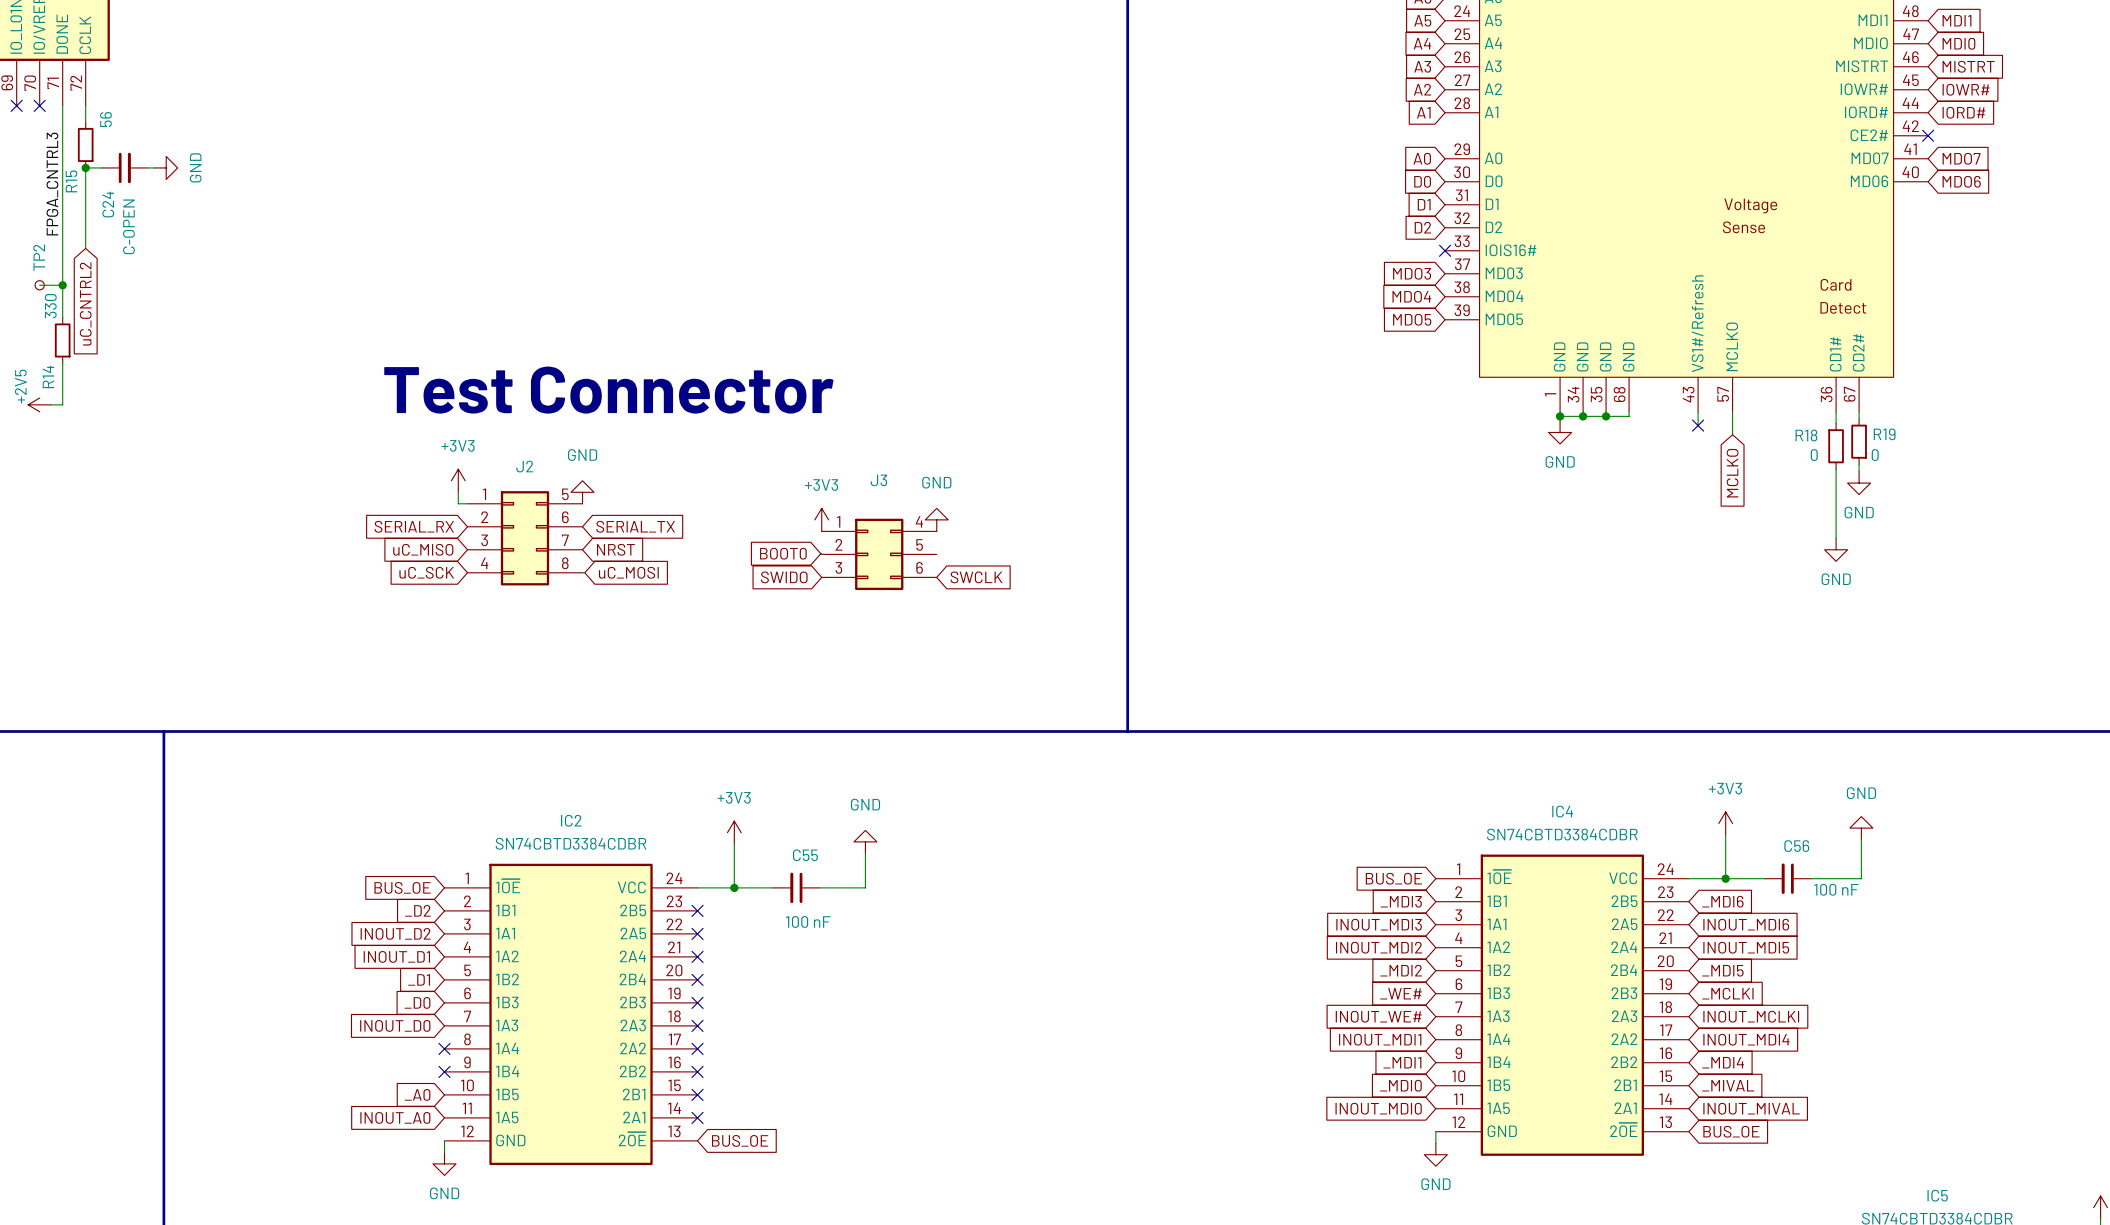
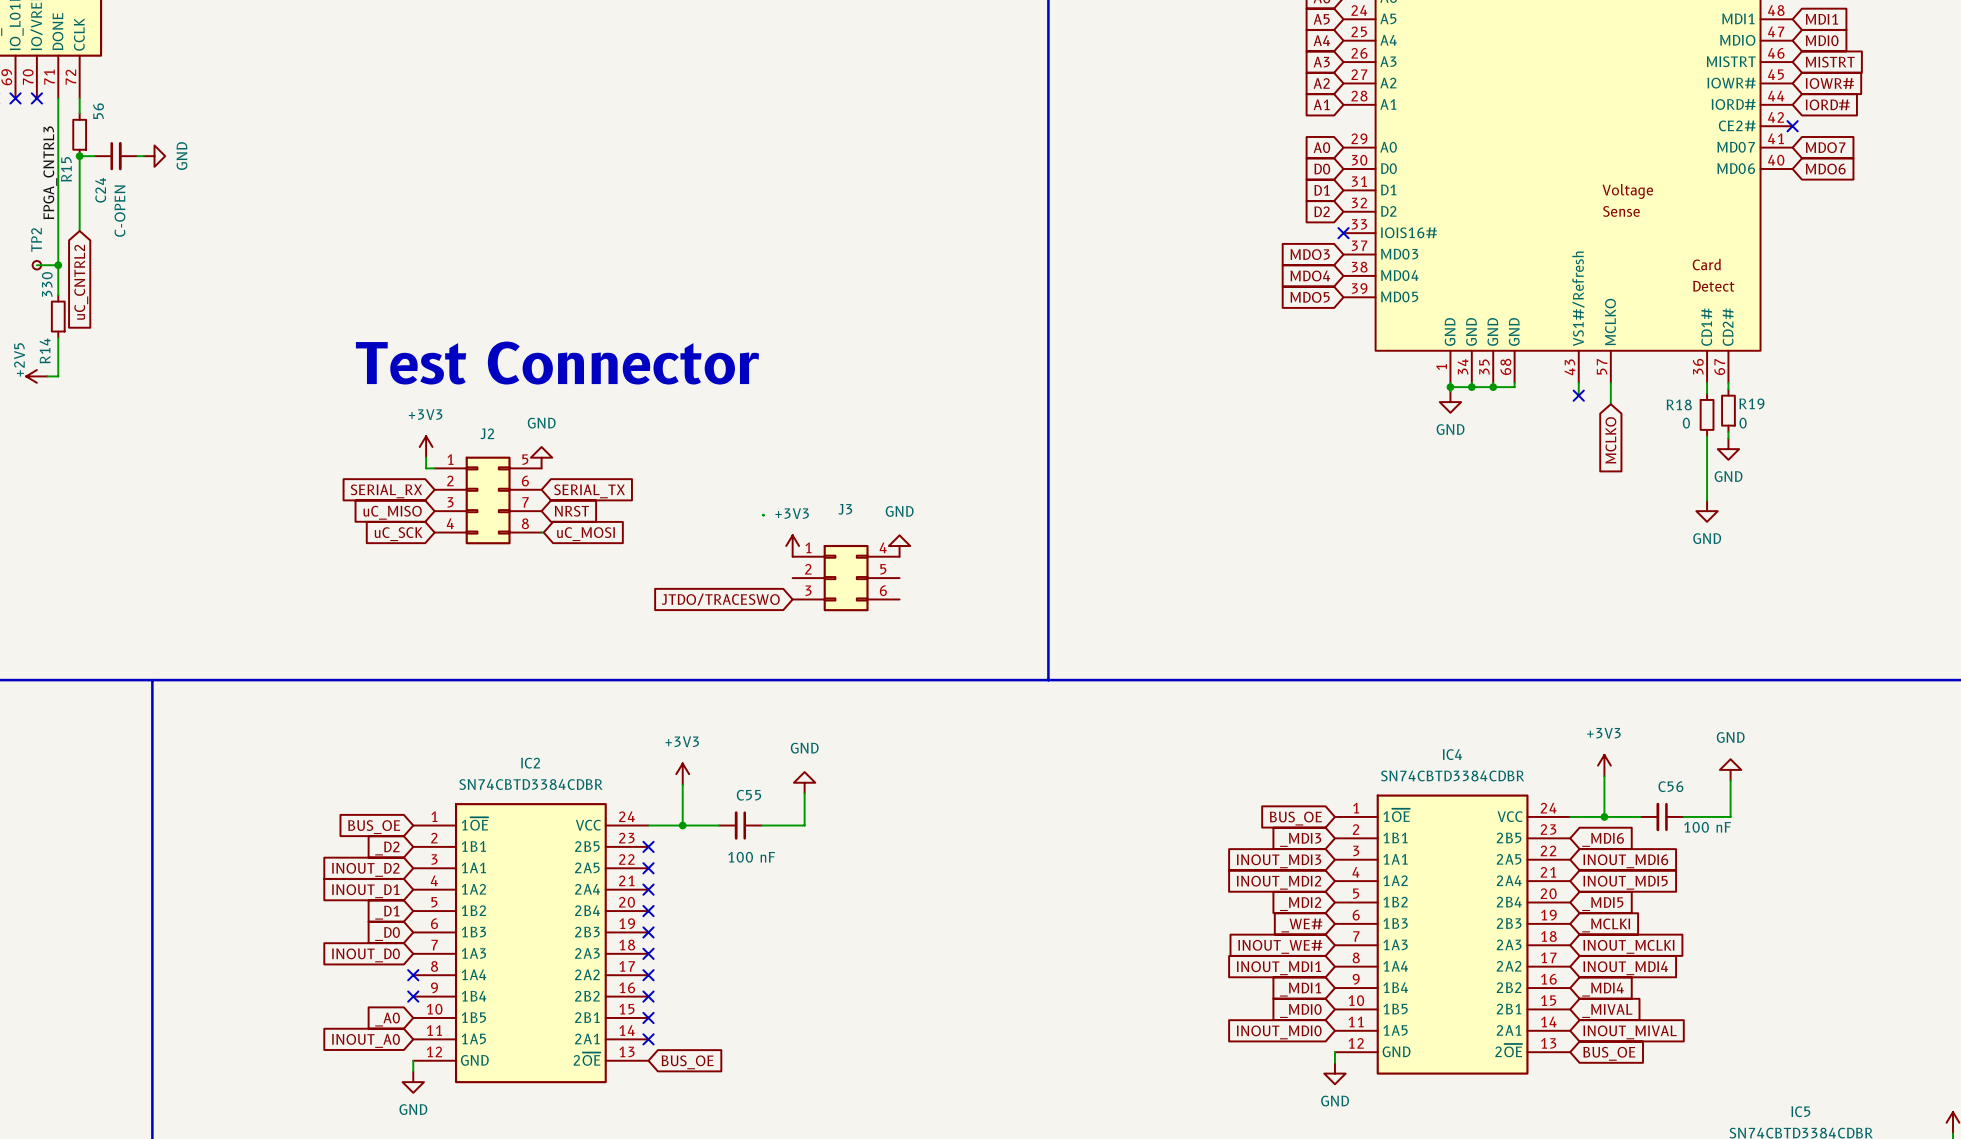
power symbol position: +3V3 (821, 519) -> +3V3 (792, 546)
power symbol position: GND (936, 519) -> GND (899, 546)
global label: BOOT0 (783, 553) -> none
J3 position: (879, 554) -> (846, 578)
global label: SWIDO (784, 577) -> none
global label: SWCLK (976, 577) -> none
global label: none -> JTDO/TRACESWO (720, 599)

